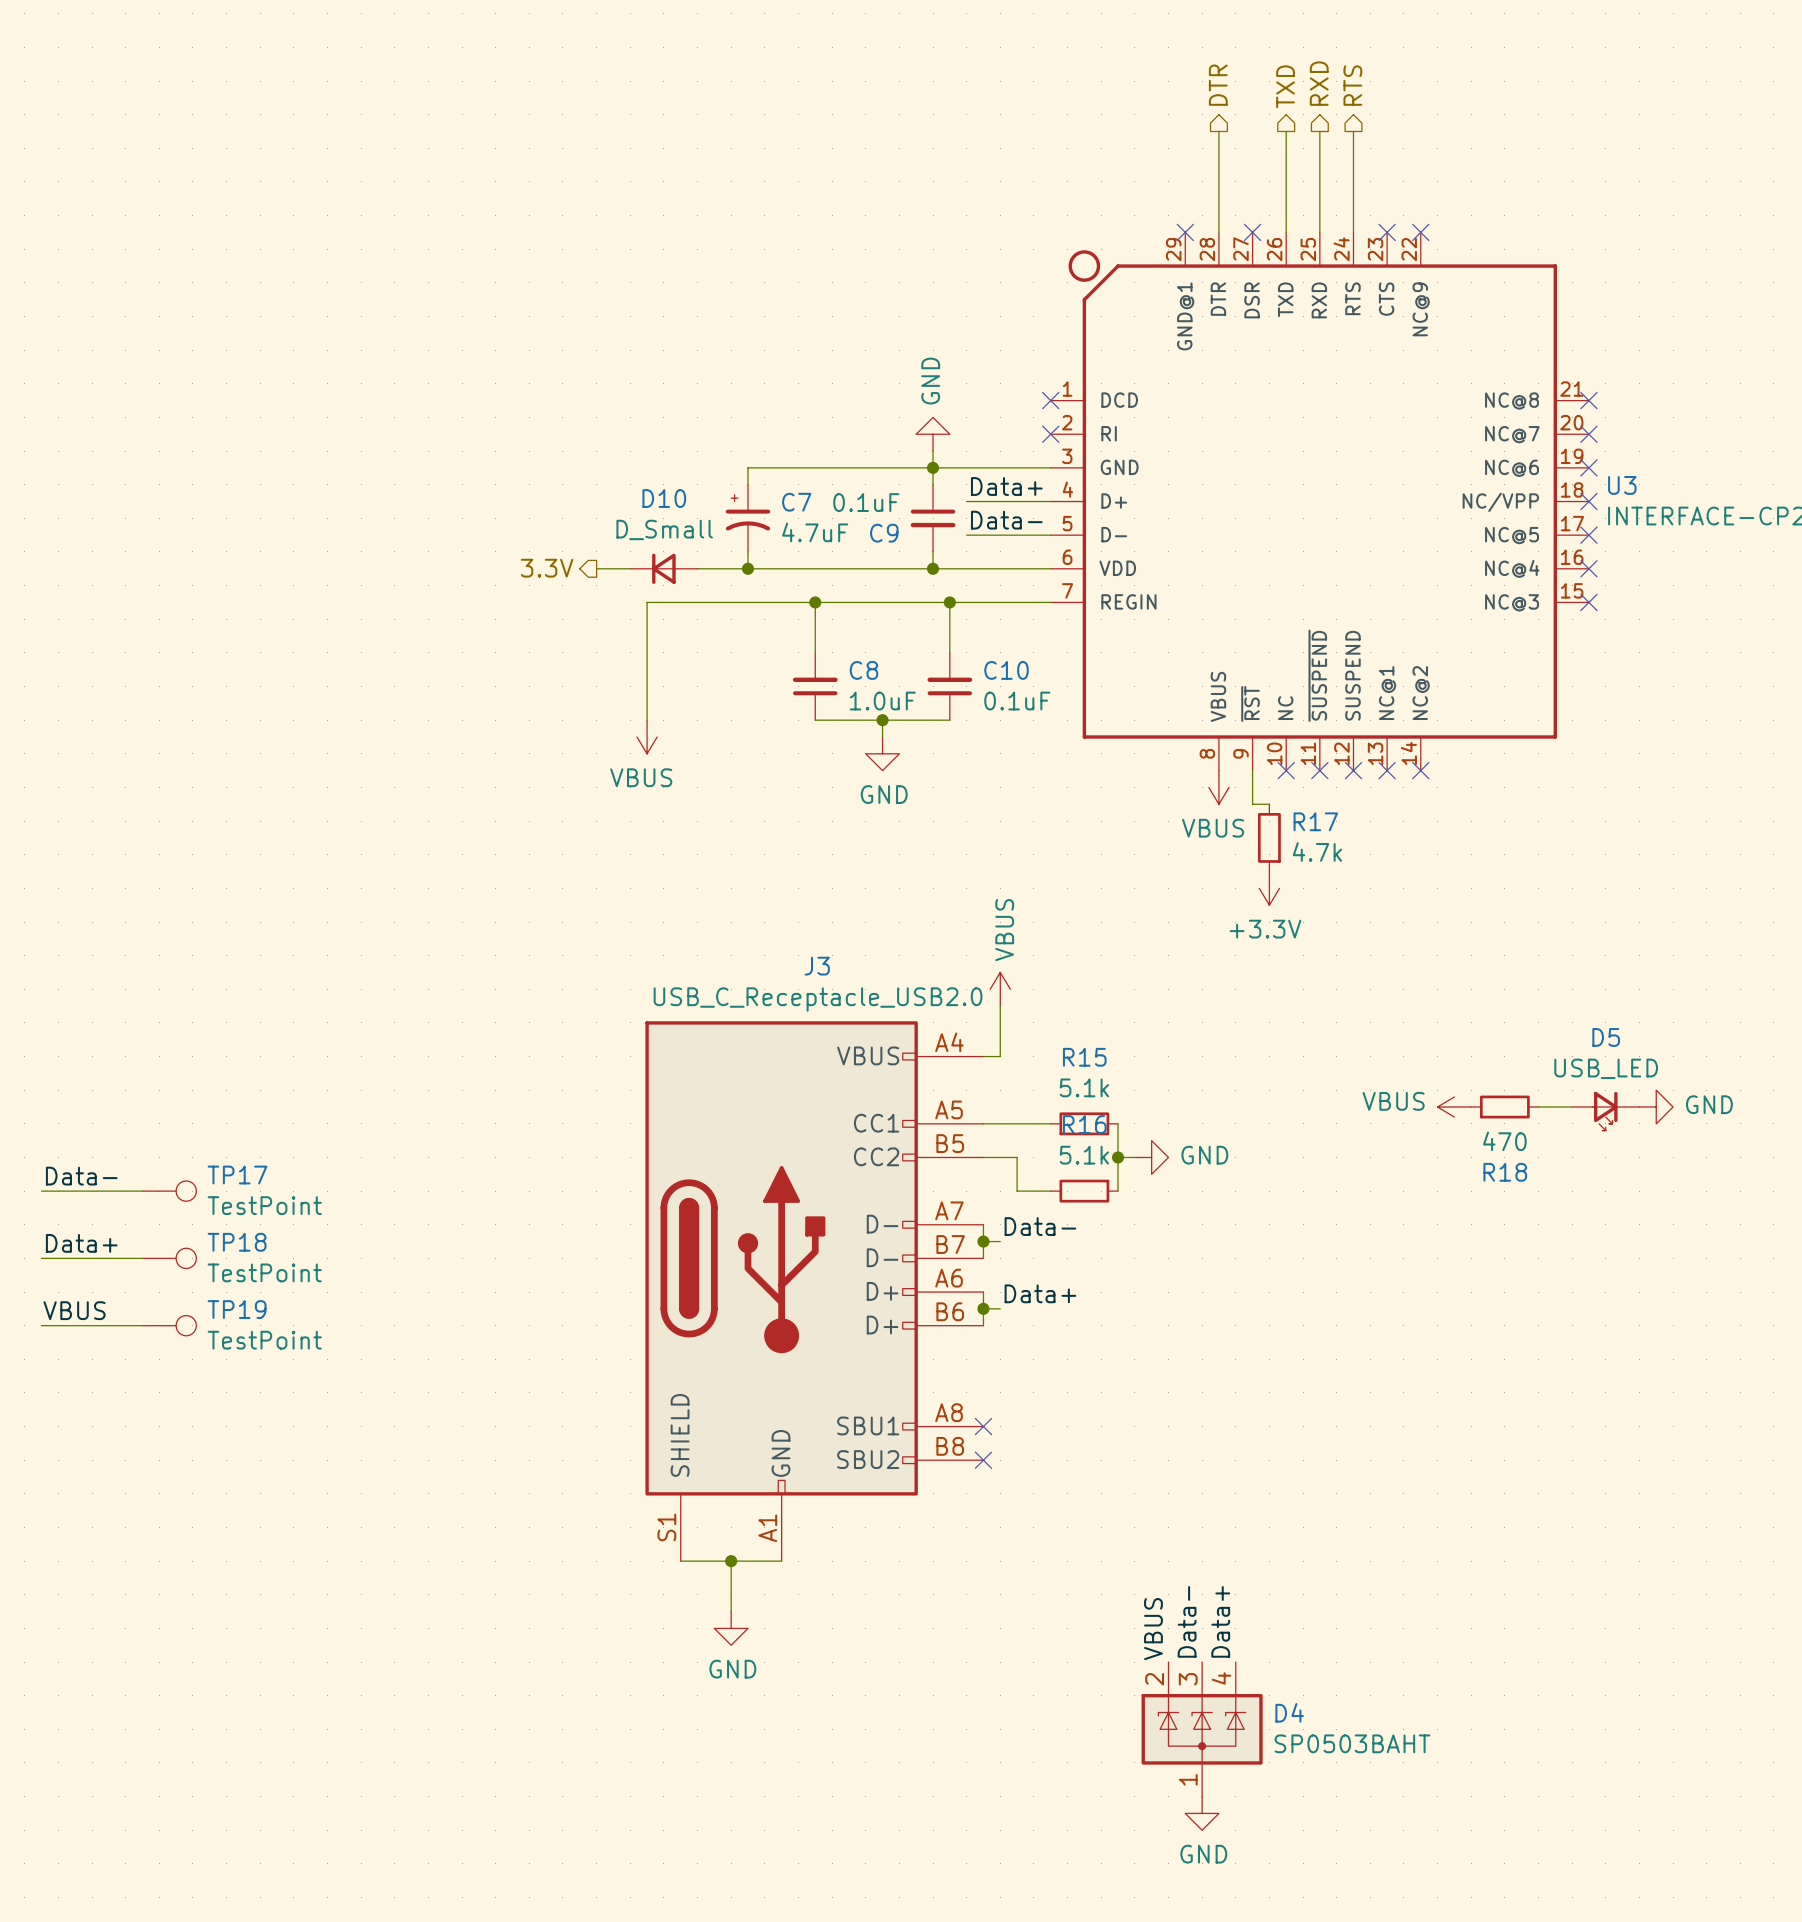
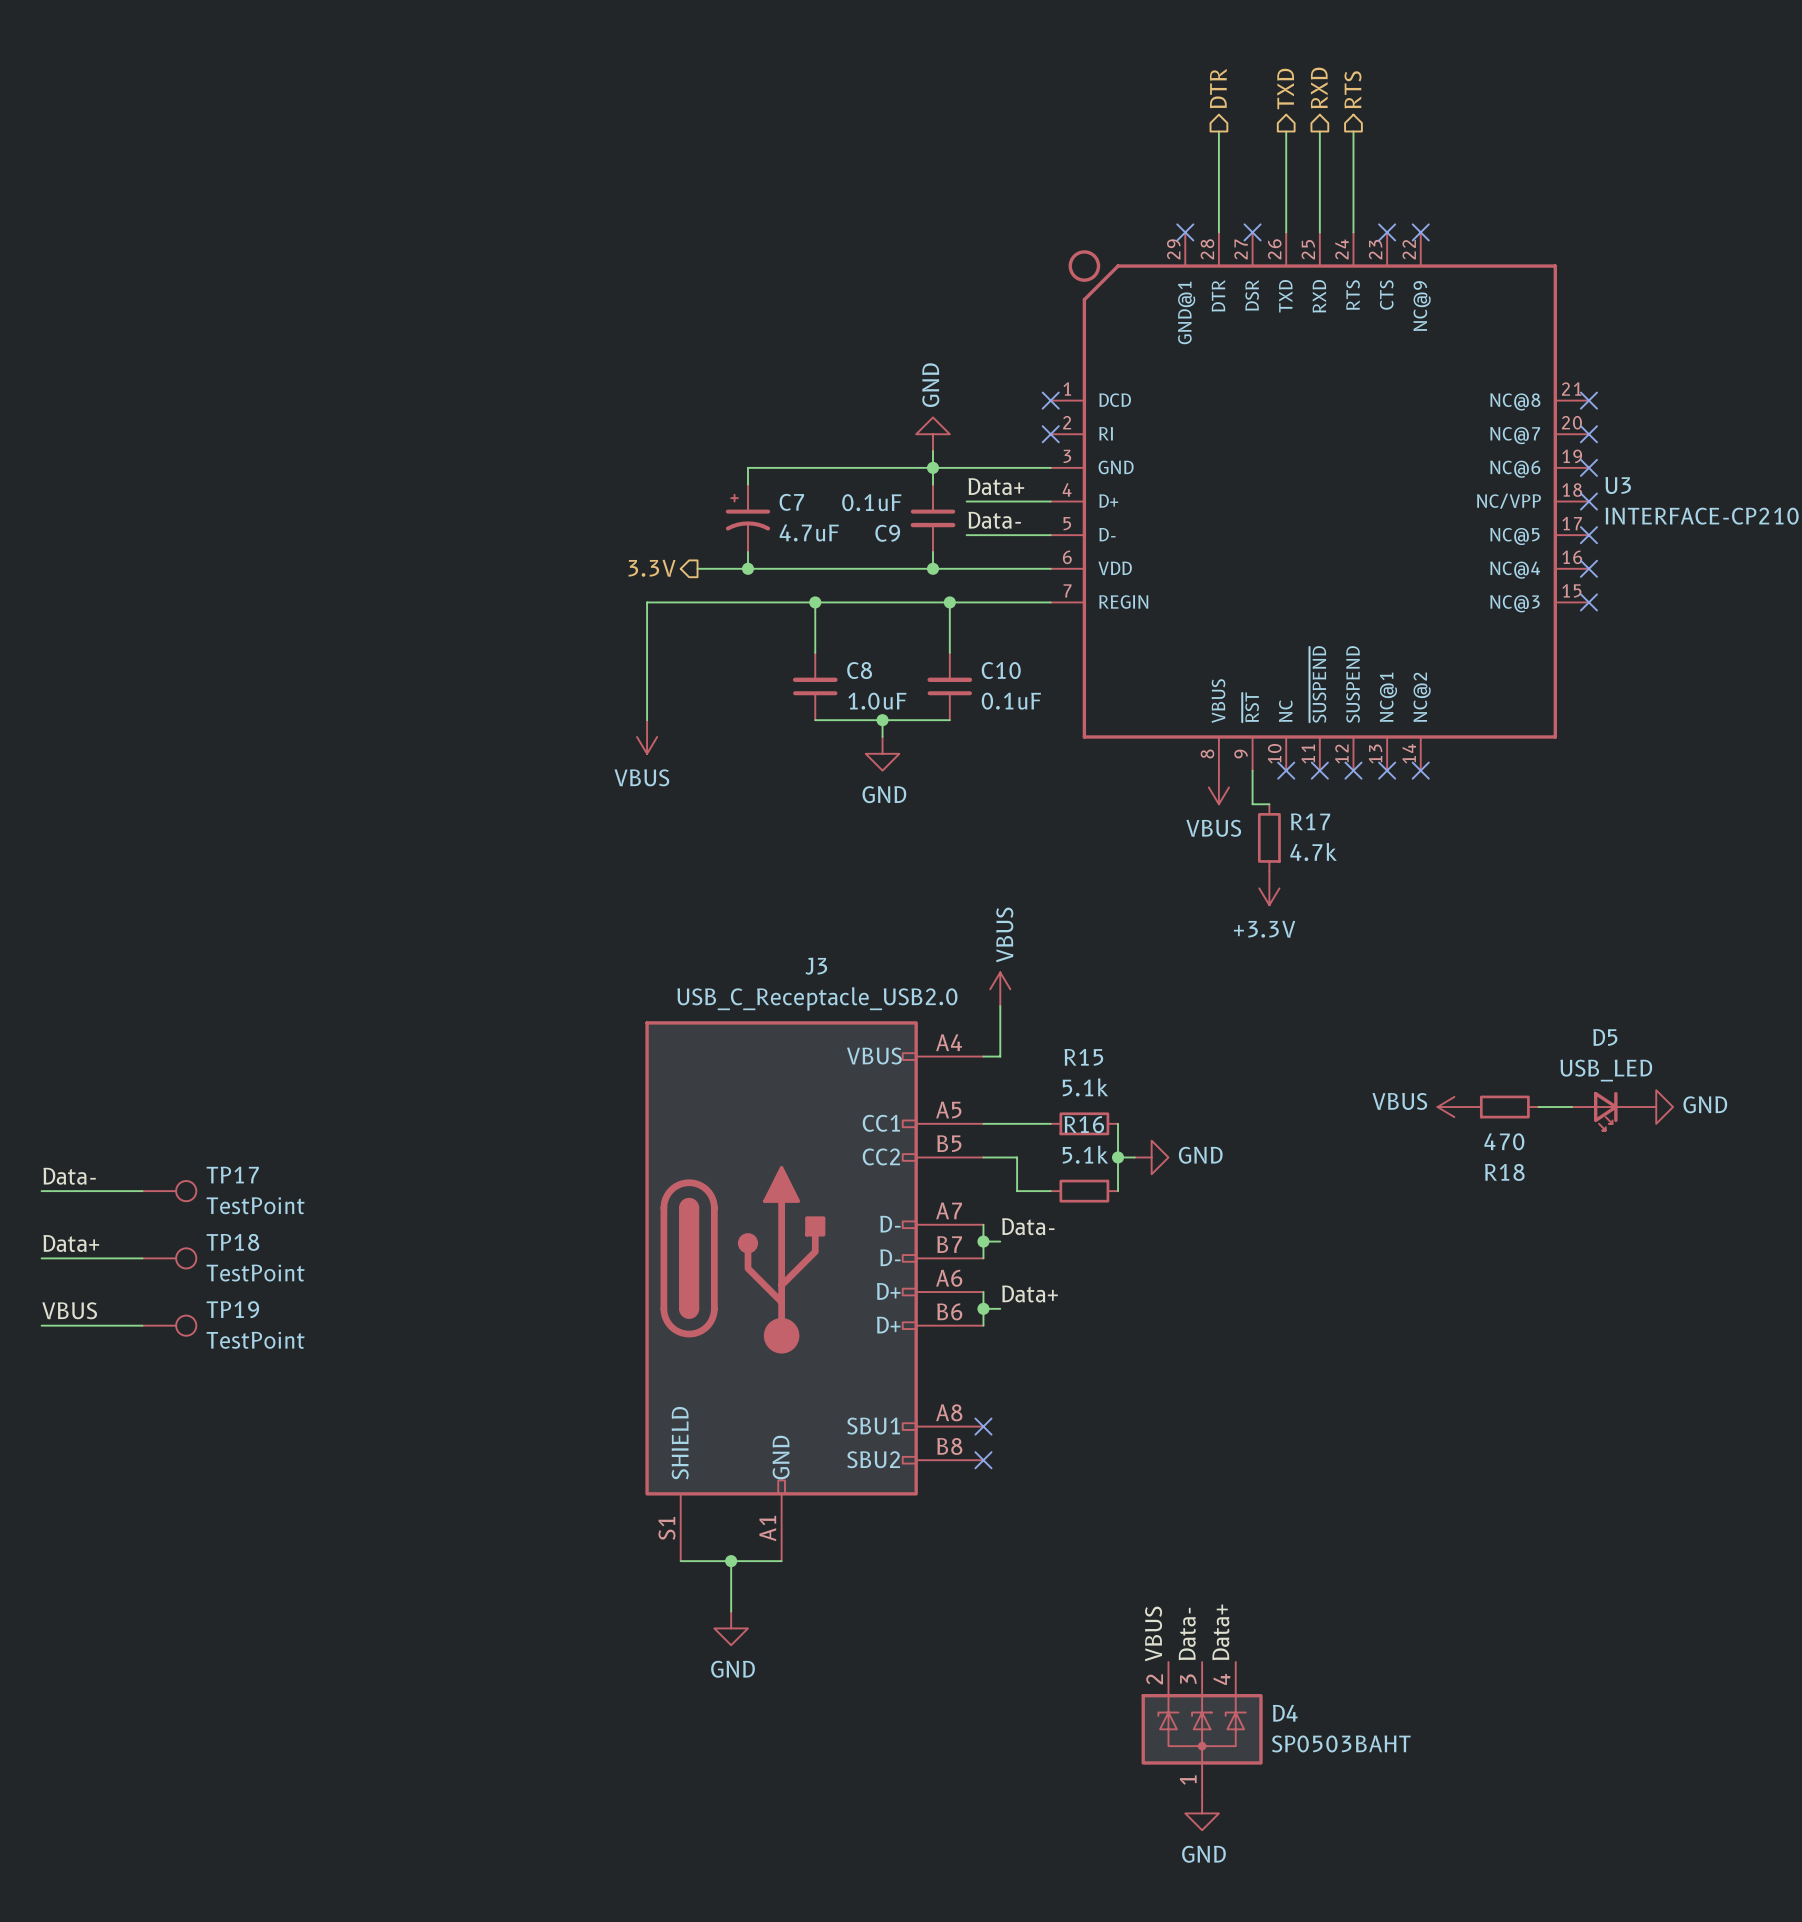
hierarchical label position: 3.3V (547, 568) -> 3.3V (652, 568)
wire: (596, 568) (630, 568) -> none
D10: D_Small (663, 568) -> none

